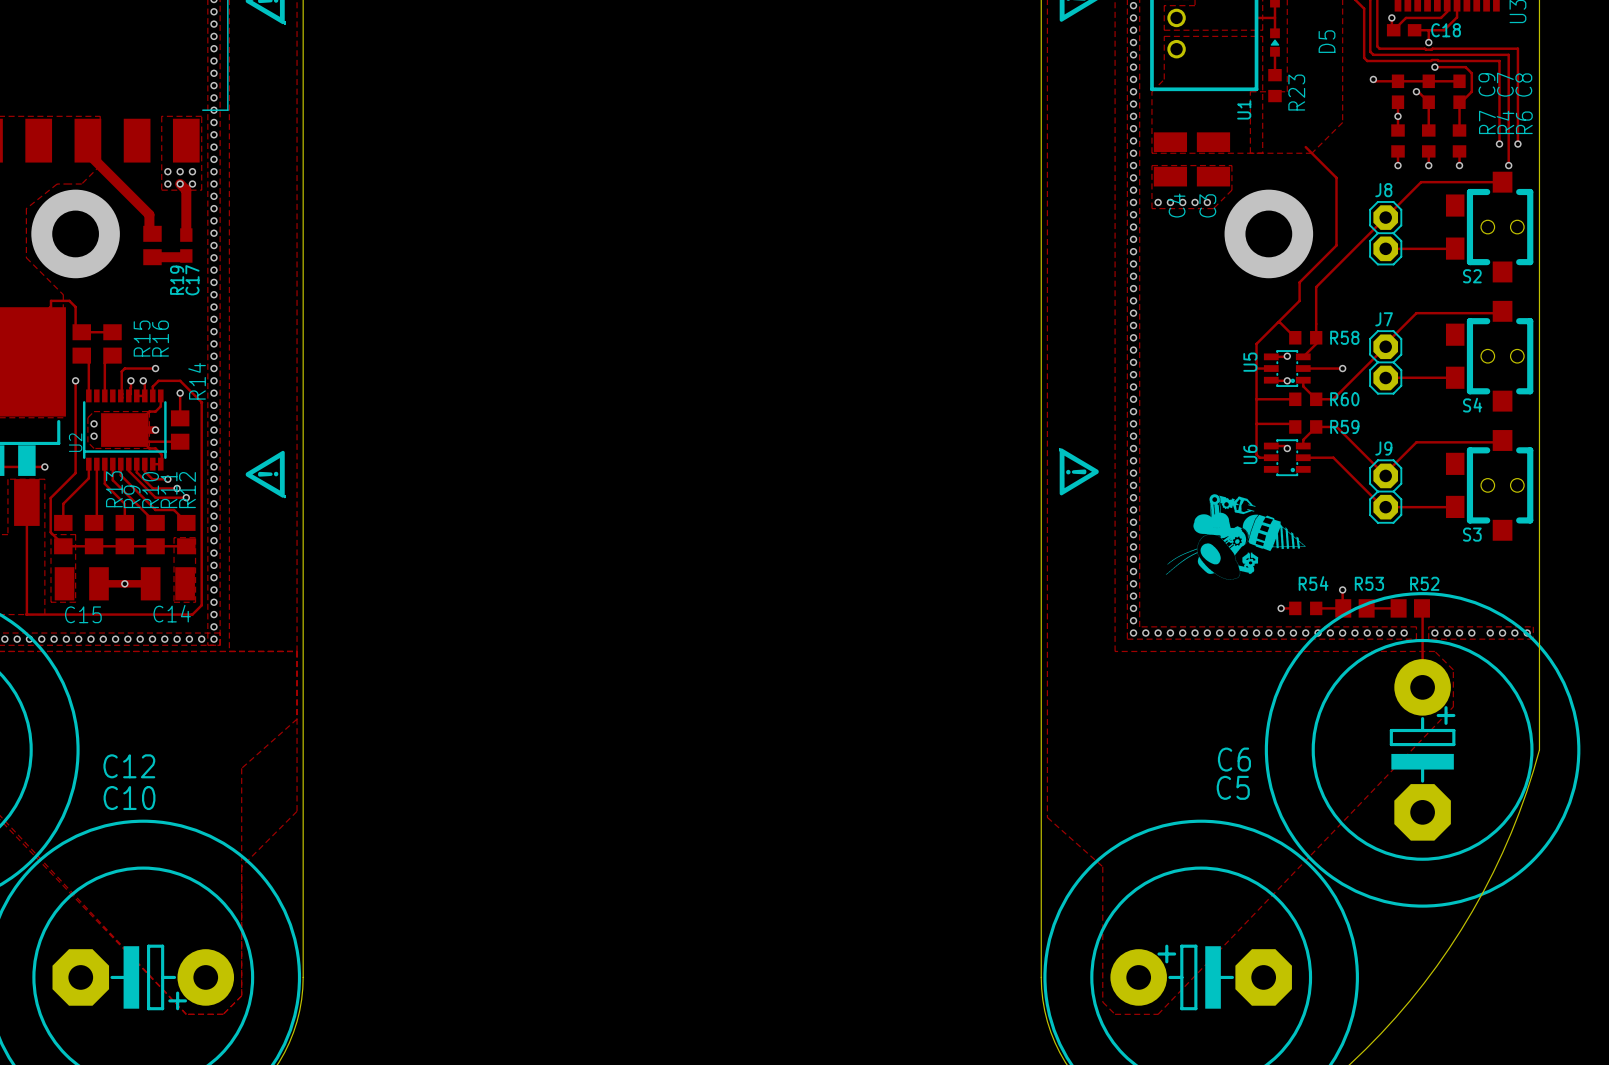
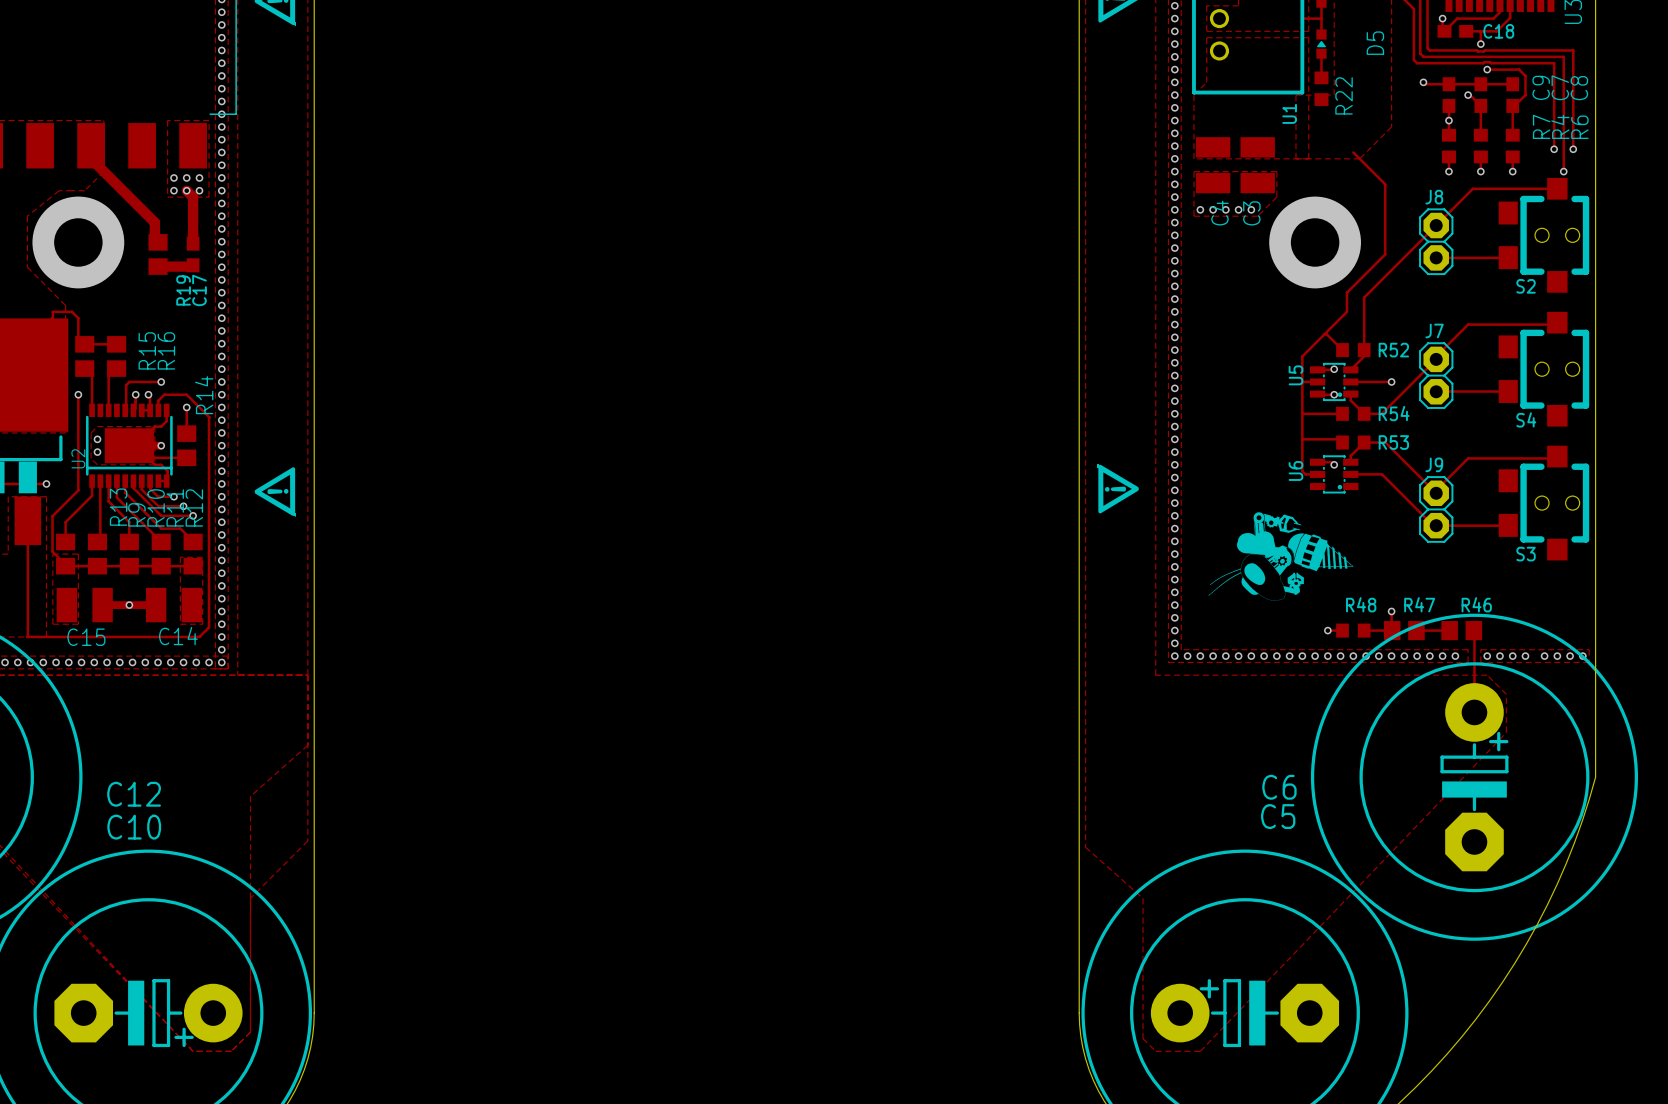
R23 name: R23 (1296, 92) -> R22 (1344, 95)
R58 name: R58 (1344, 337) -> R52 (1393, 350)
R60 name: R60 (1344, 399) -> R54 (1394, 413)
R59 name: R59 (1344, 426) -> R53 (1393, 442)
R54 name: R54 (1313, 583) -> R48 (1361, 604)
R53 name: R53 (1369, 583) -> R47 (1419, 604)
R52 name: R52 (1424, 583) -> R46 (1476, 604)

